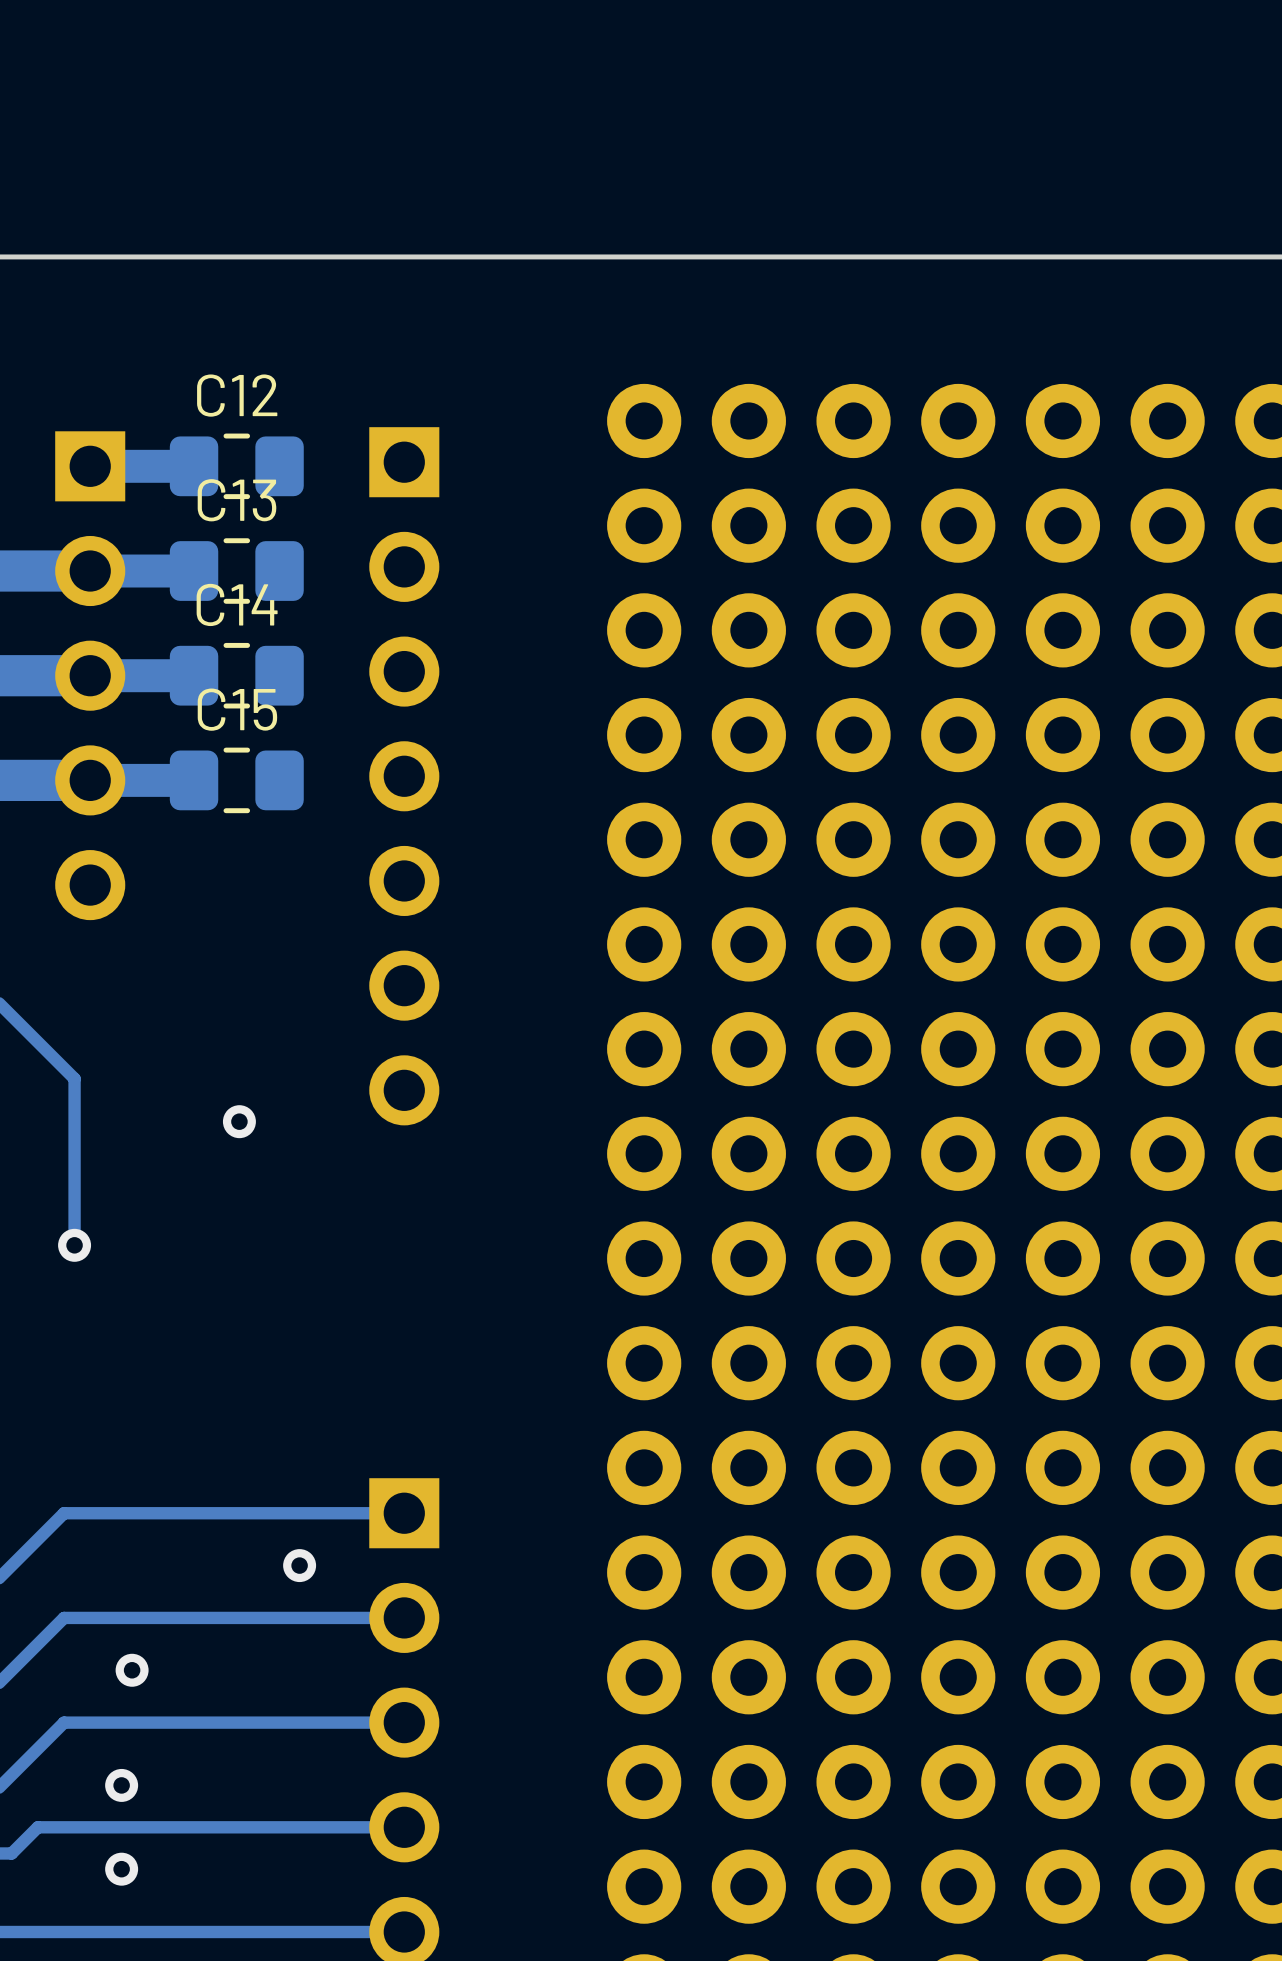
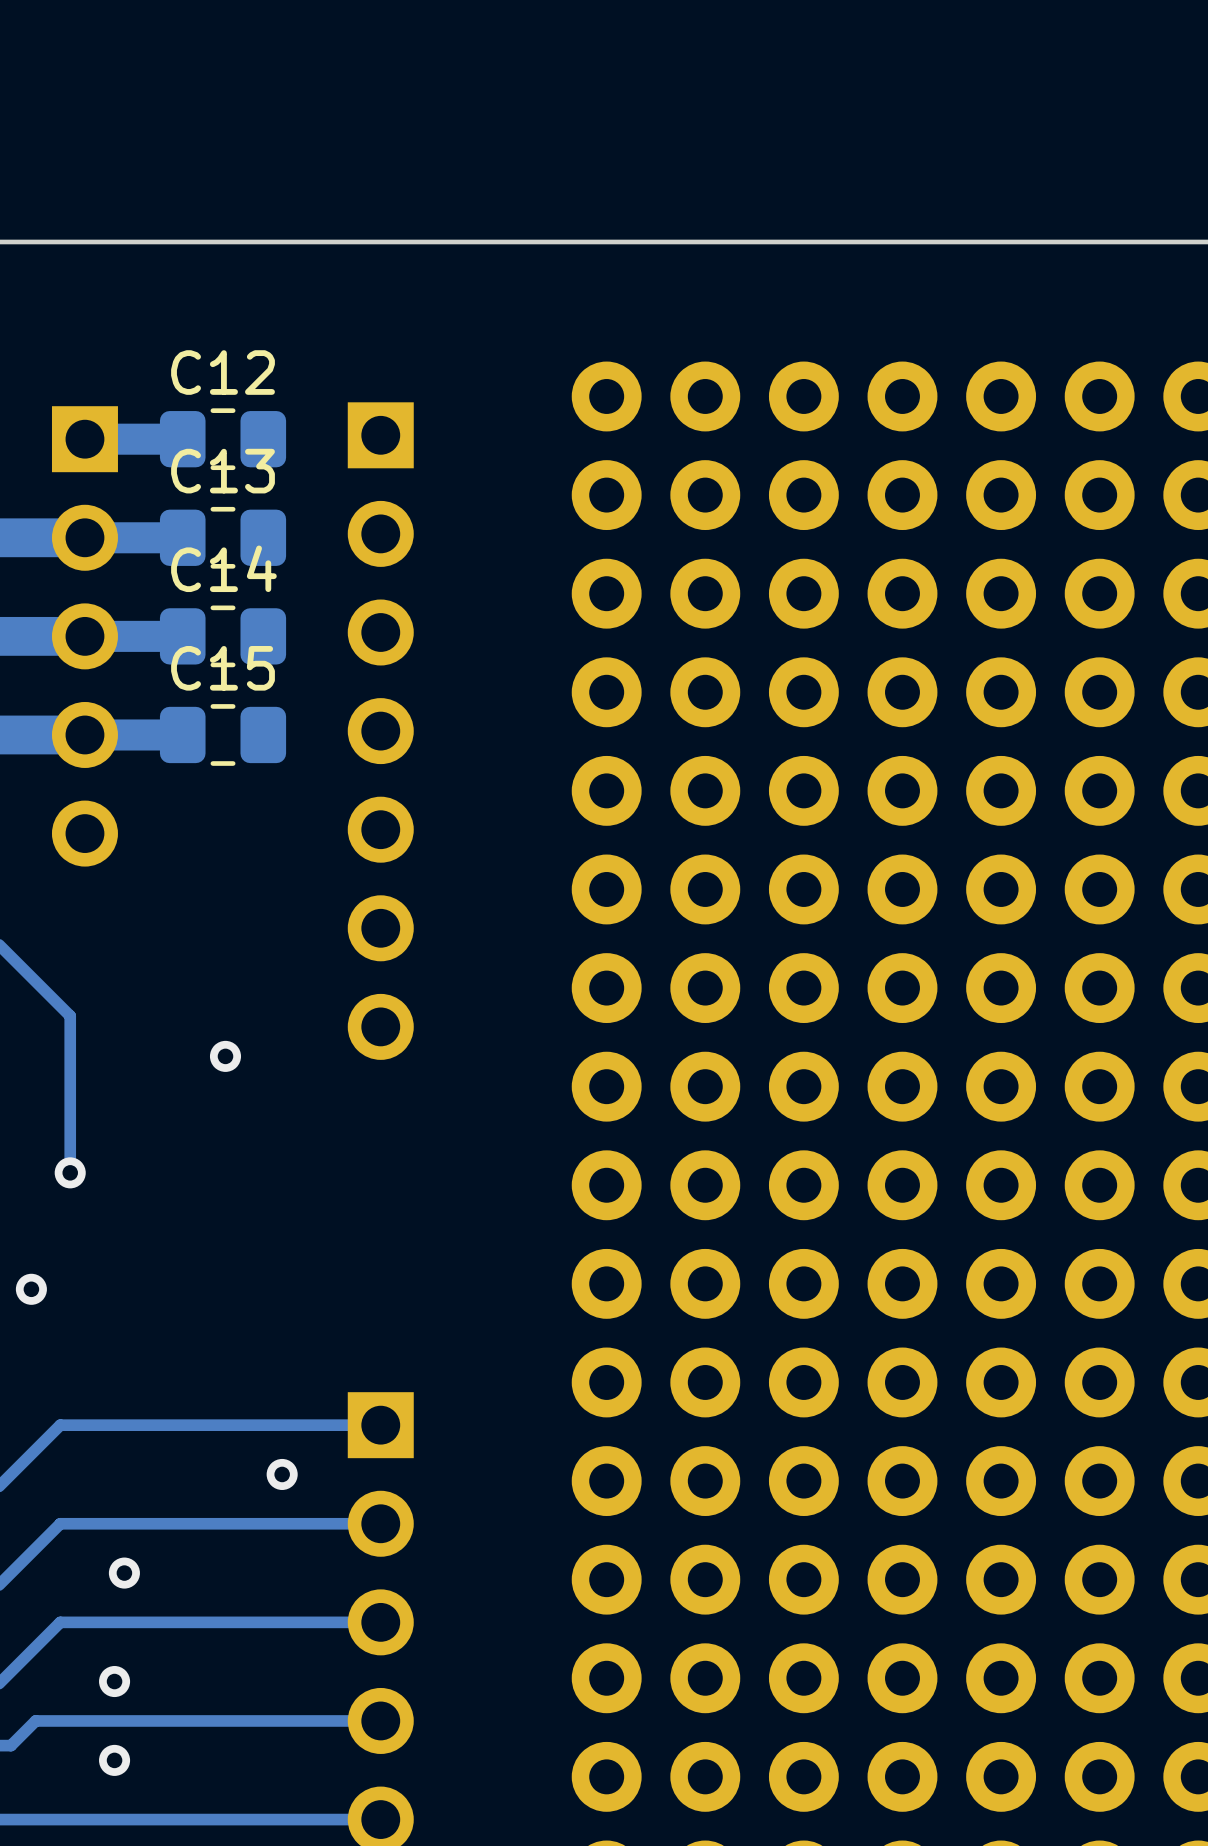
via: none -> (31, 1289)

